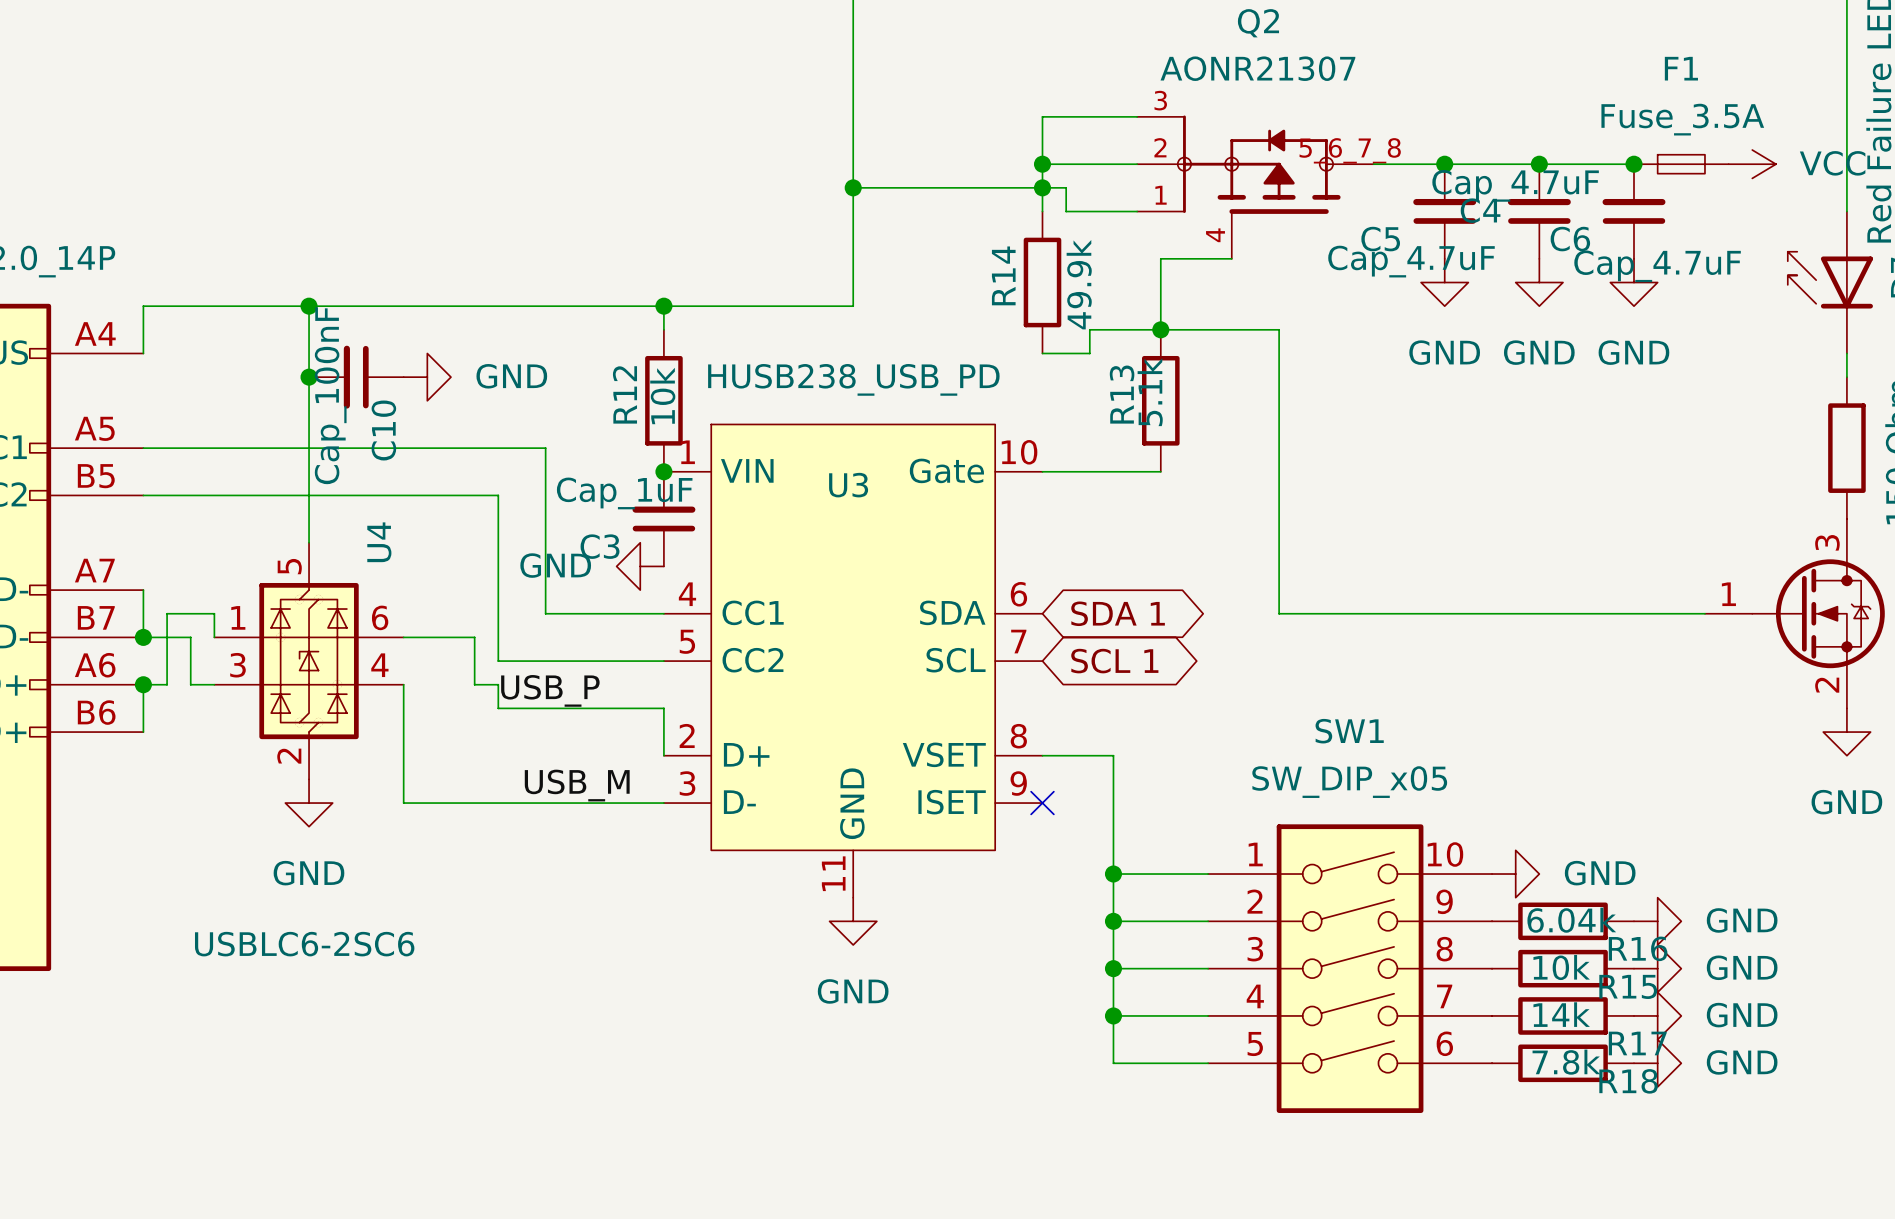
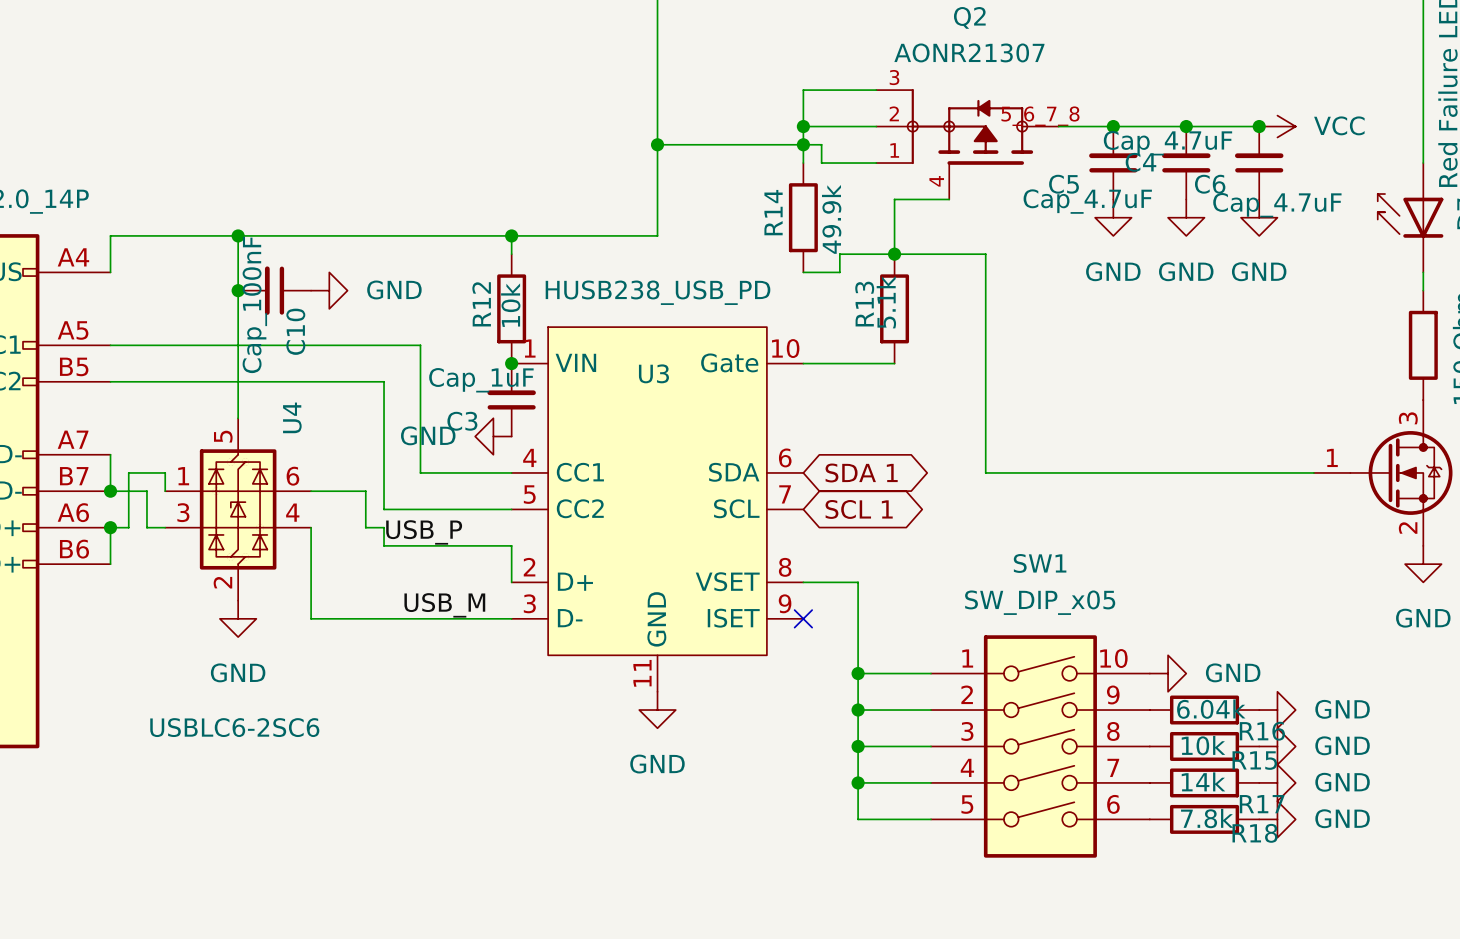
F1: Fuse_3.5A (1681, 164) -> none
power symbol position: VCC (1752, 164) -> VCC (1277, 126)

